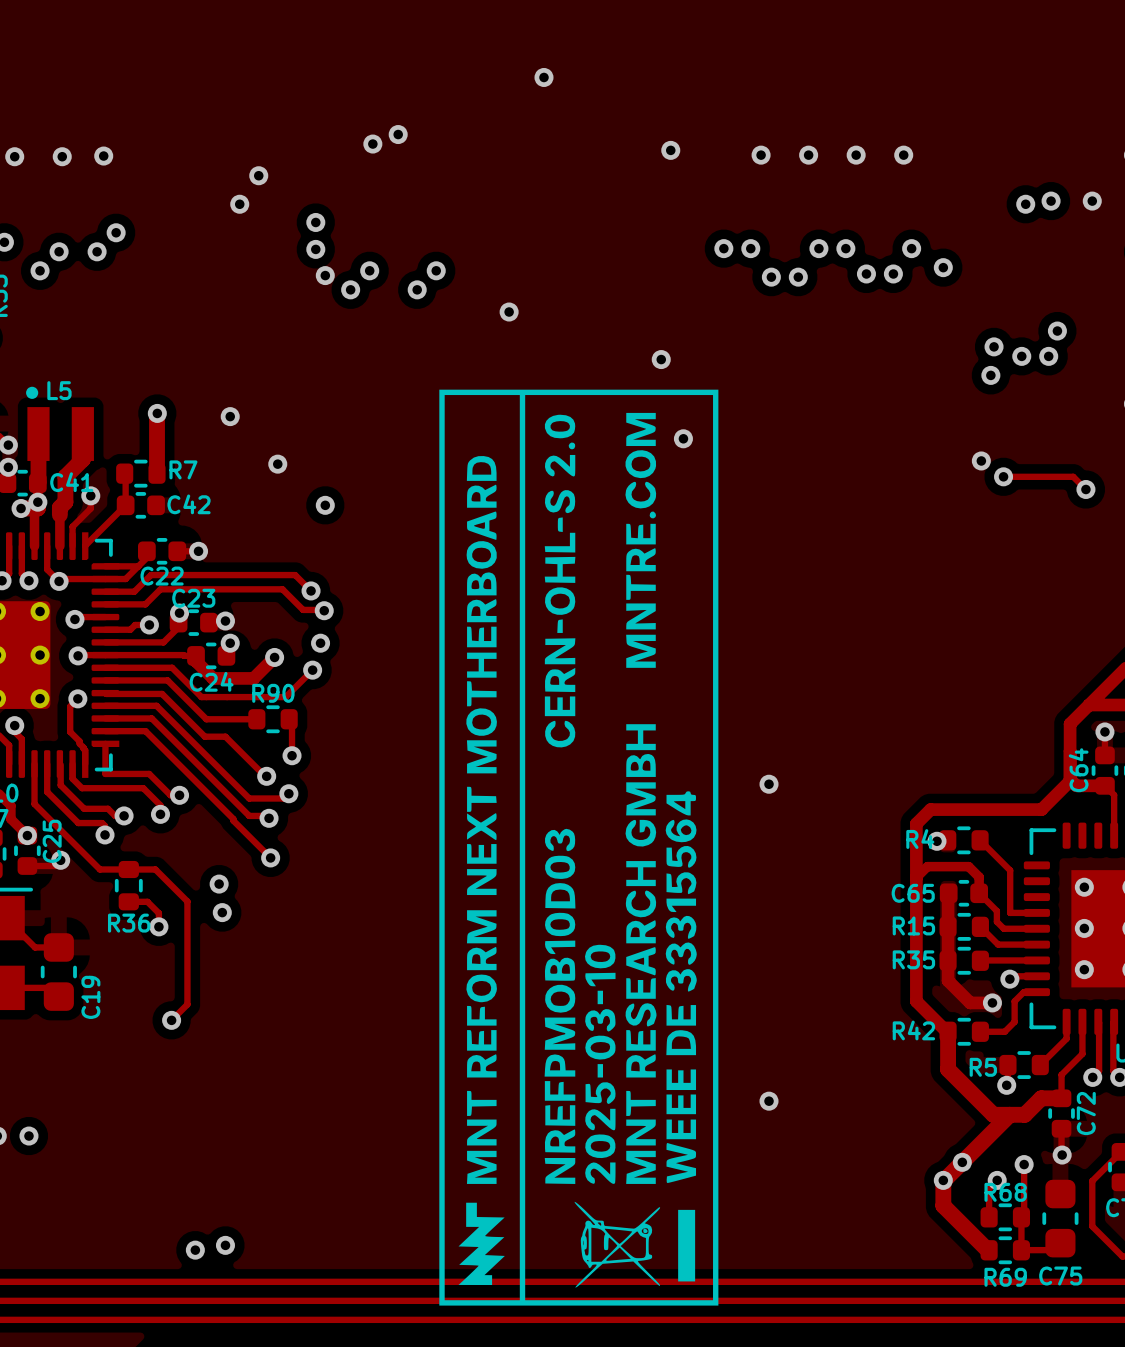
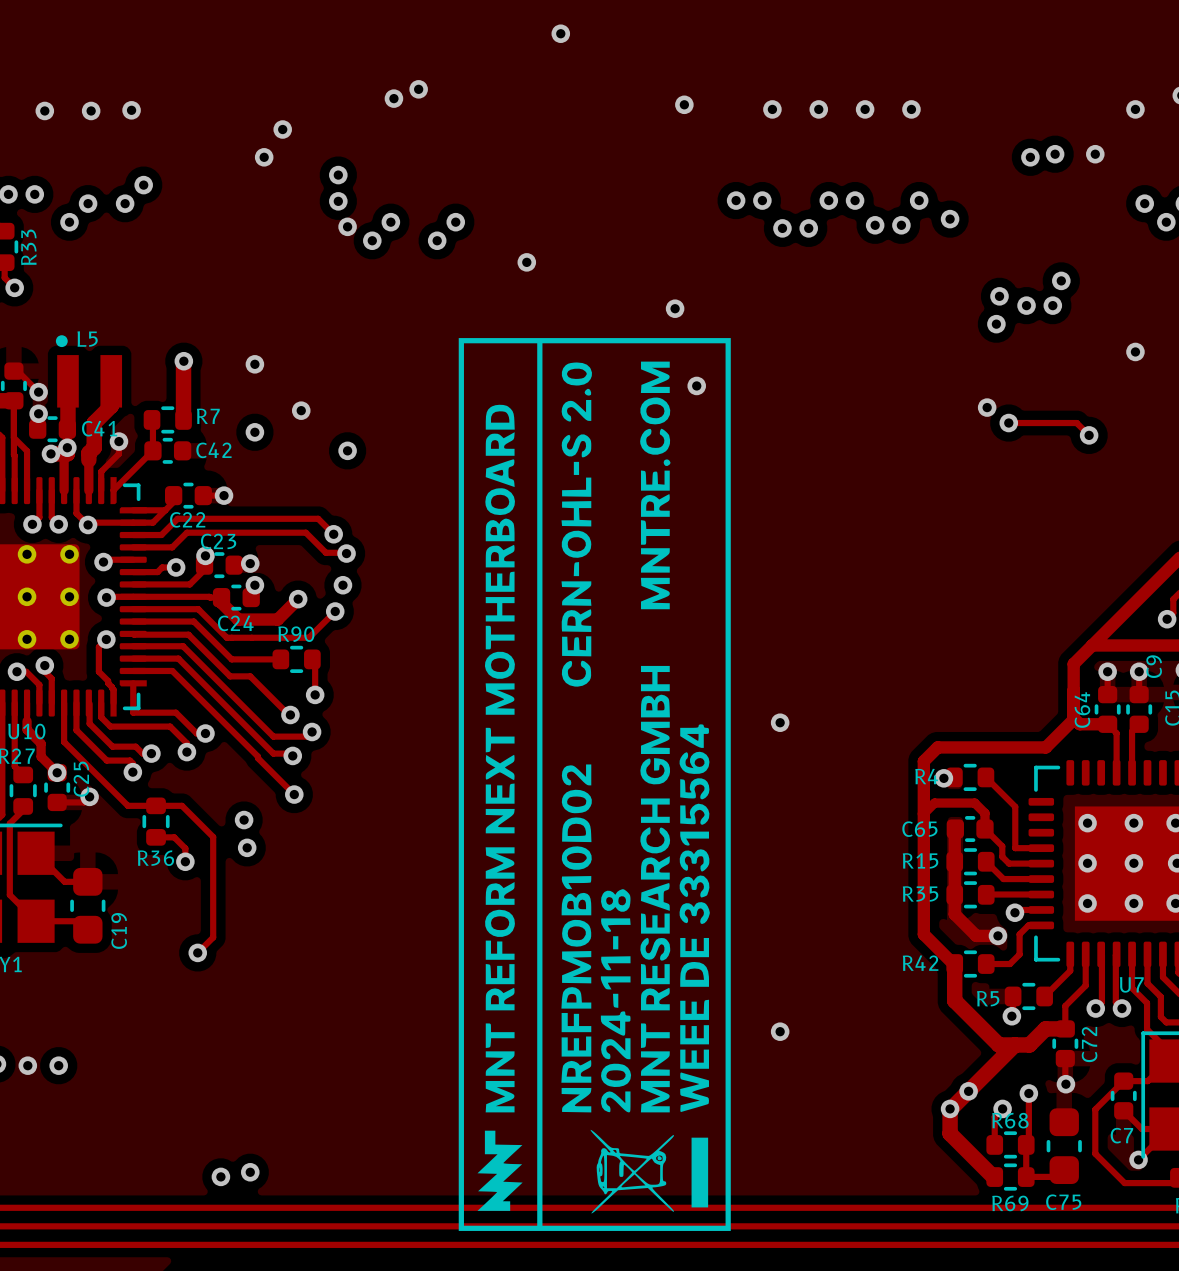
drawing shape: [439, 389, 719, 1306] -> [458, 338, 731, 1231]
via: none -> (254, 432)

